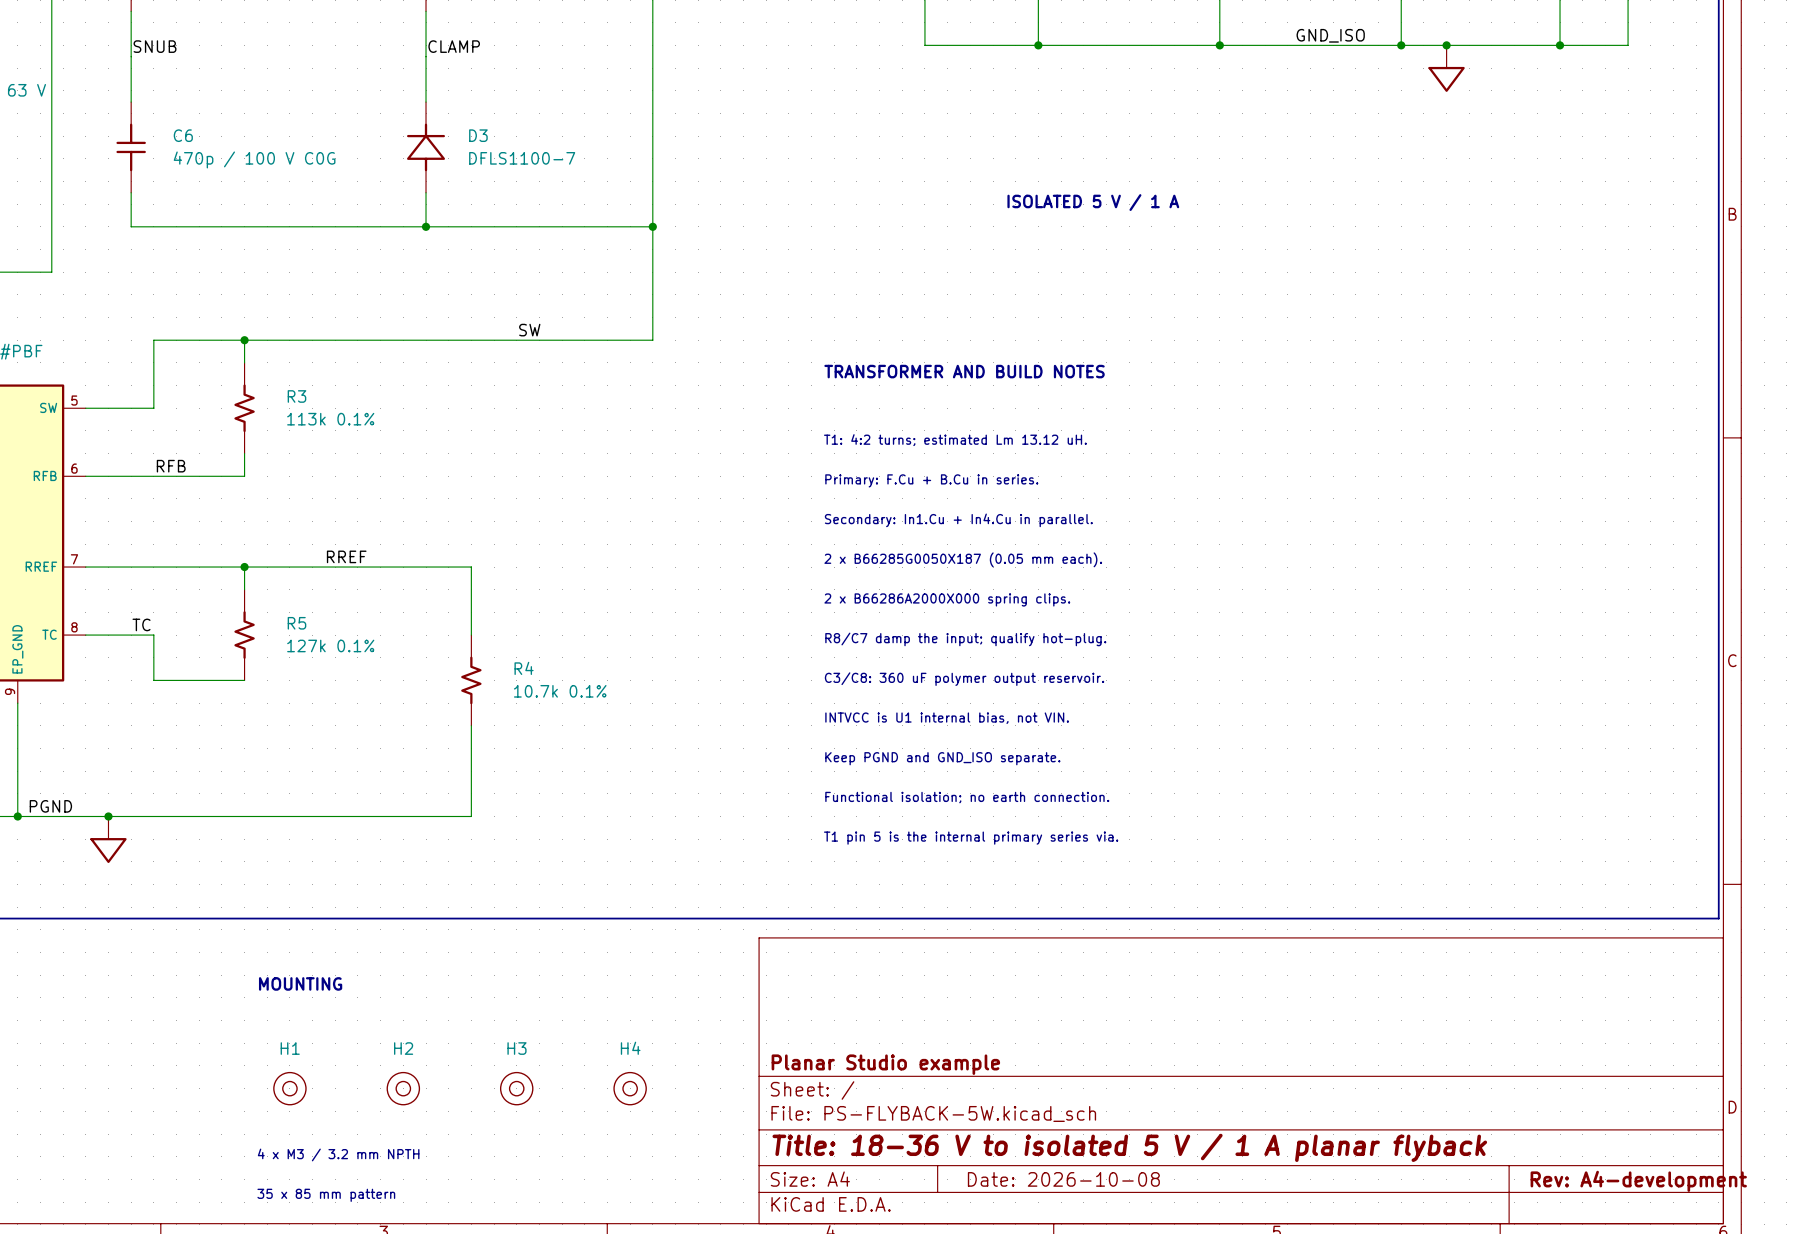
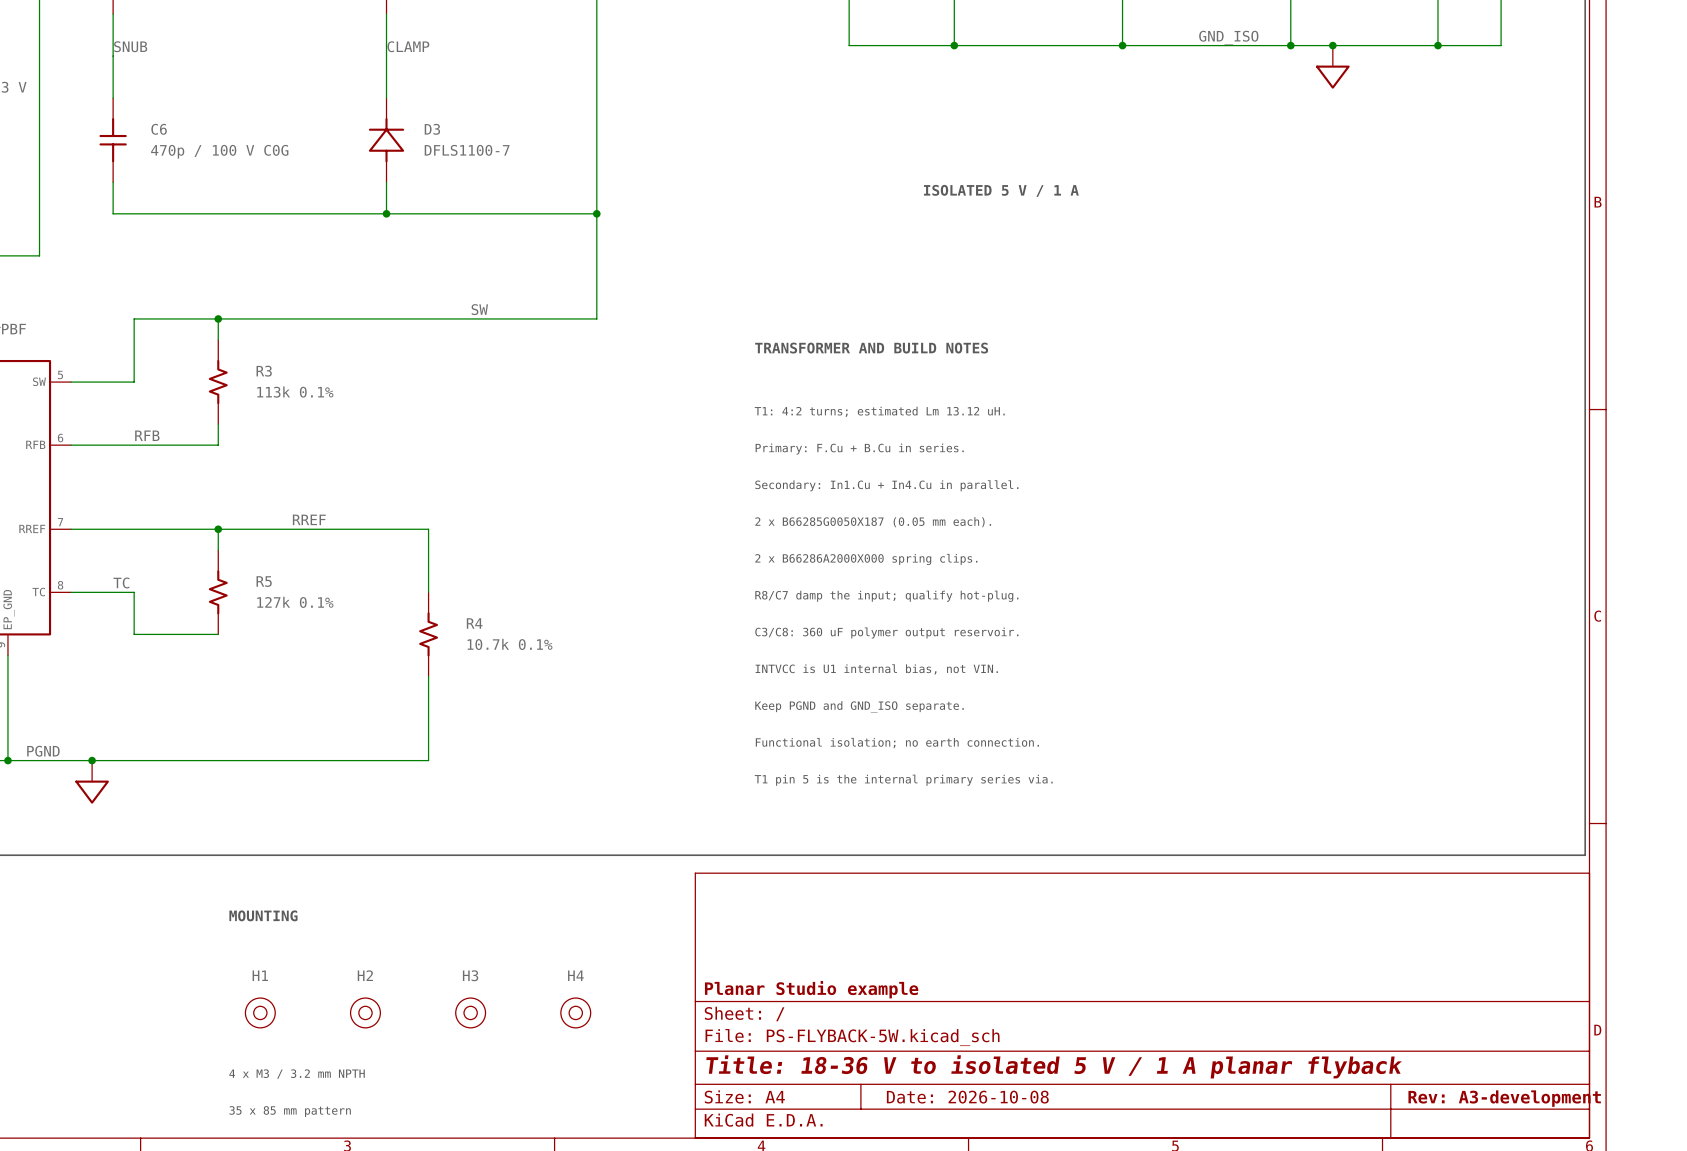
title block: Rev: A4-development (1638, 1181) -> Rev: A3-development (1504, 1098)

